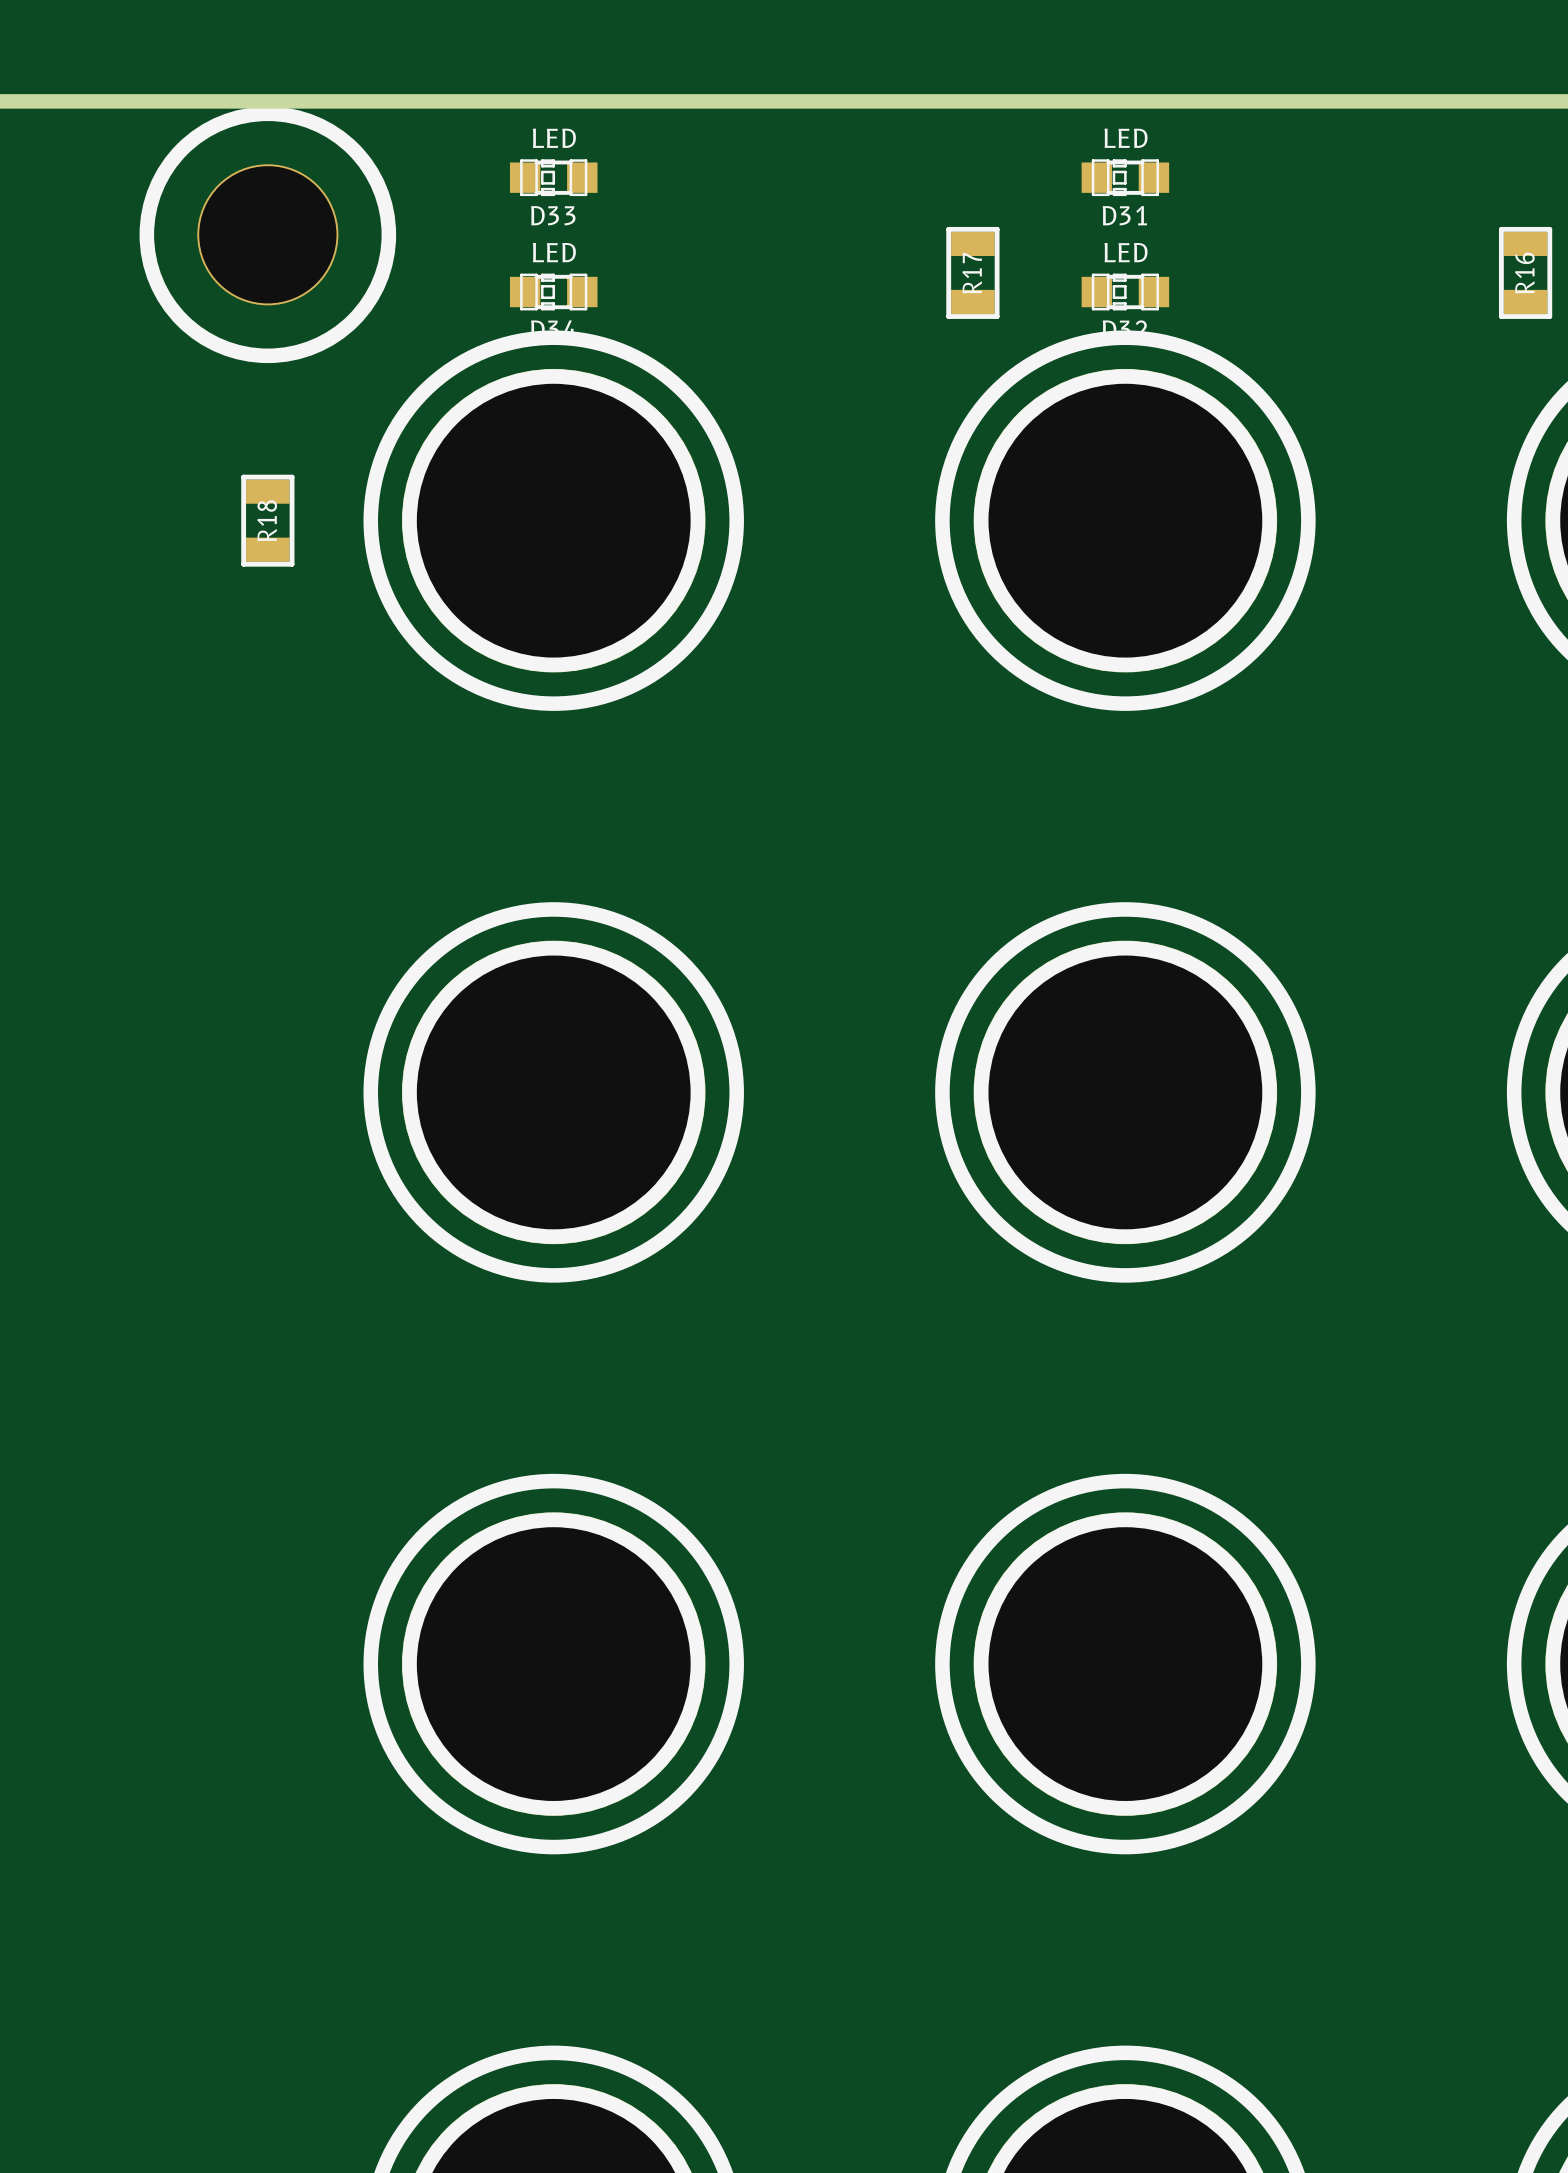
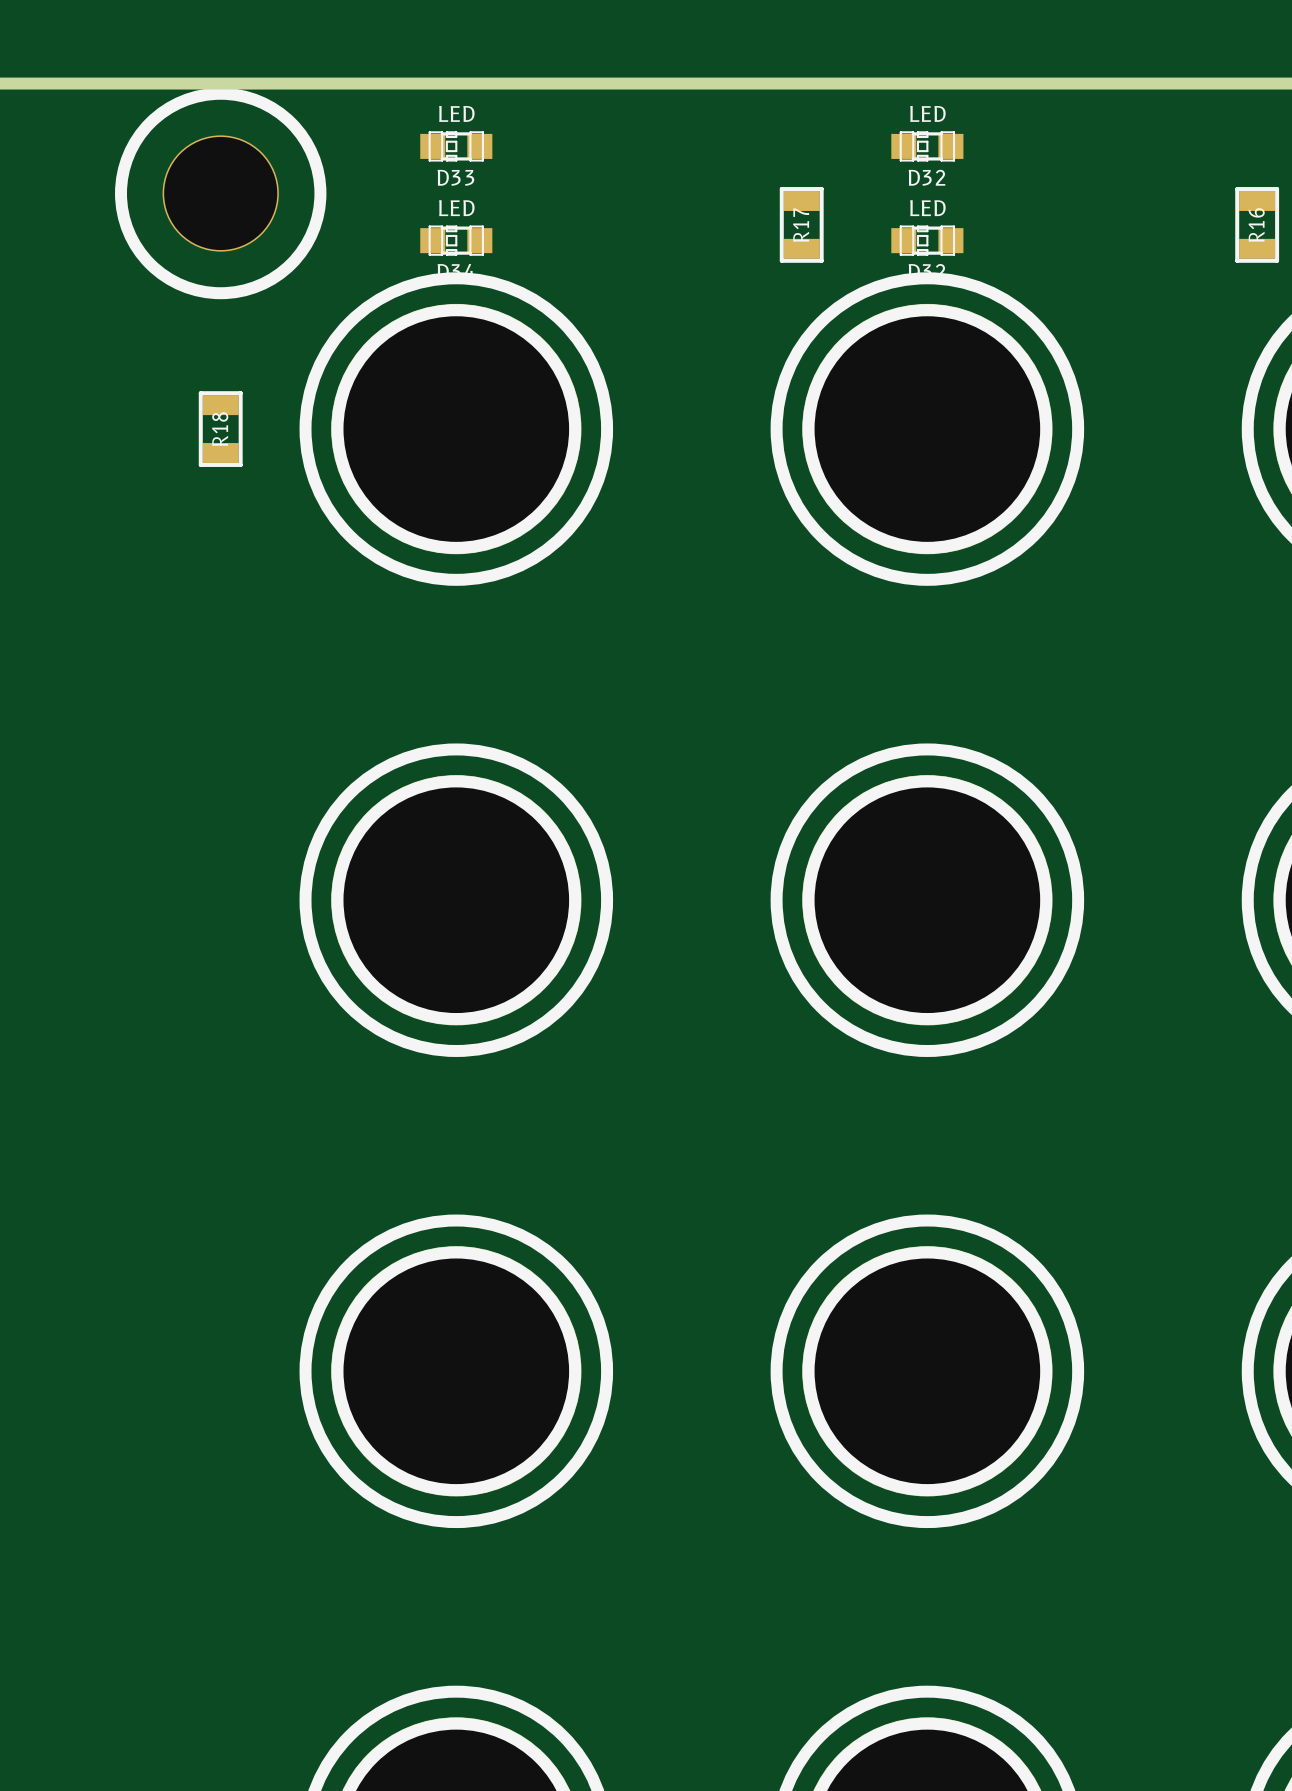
D31 name: D31 (1124, 215) -> D32 (926, 177)

